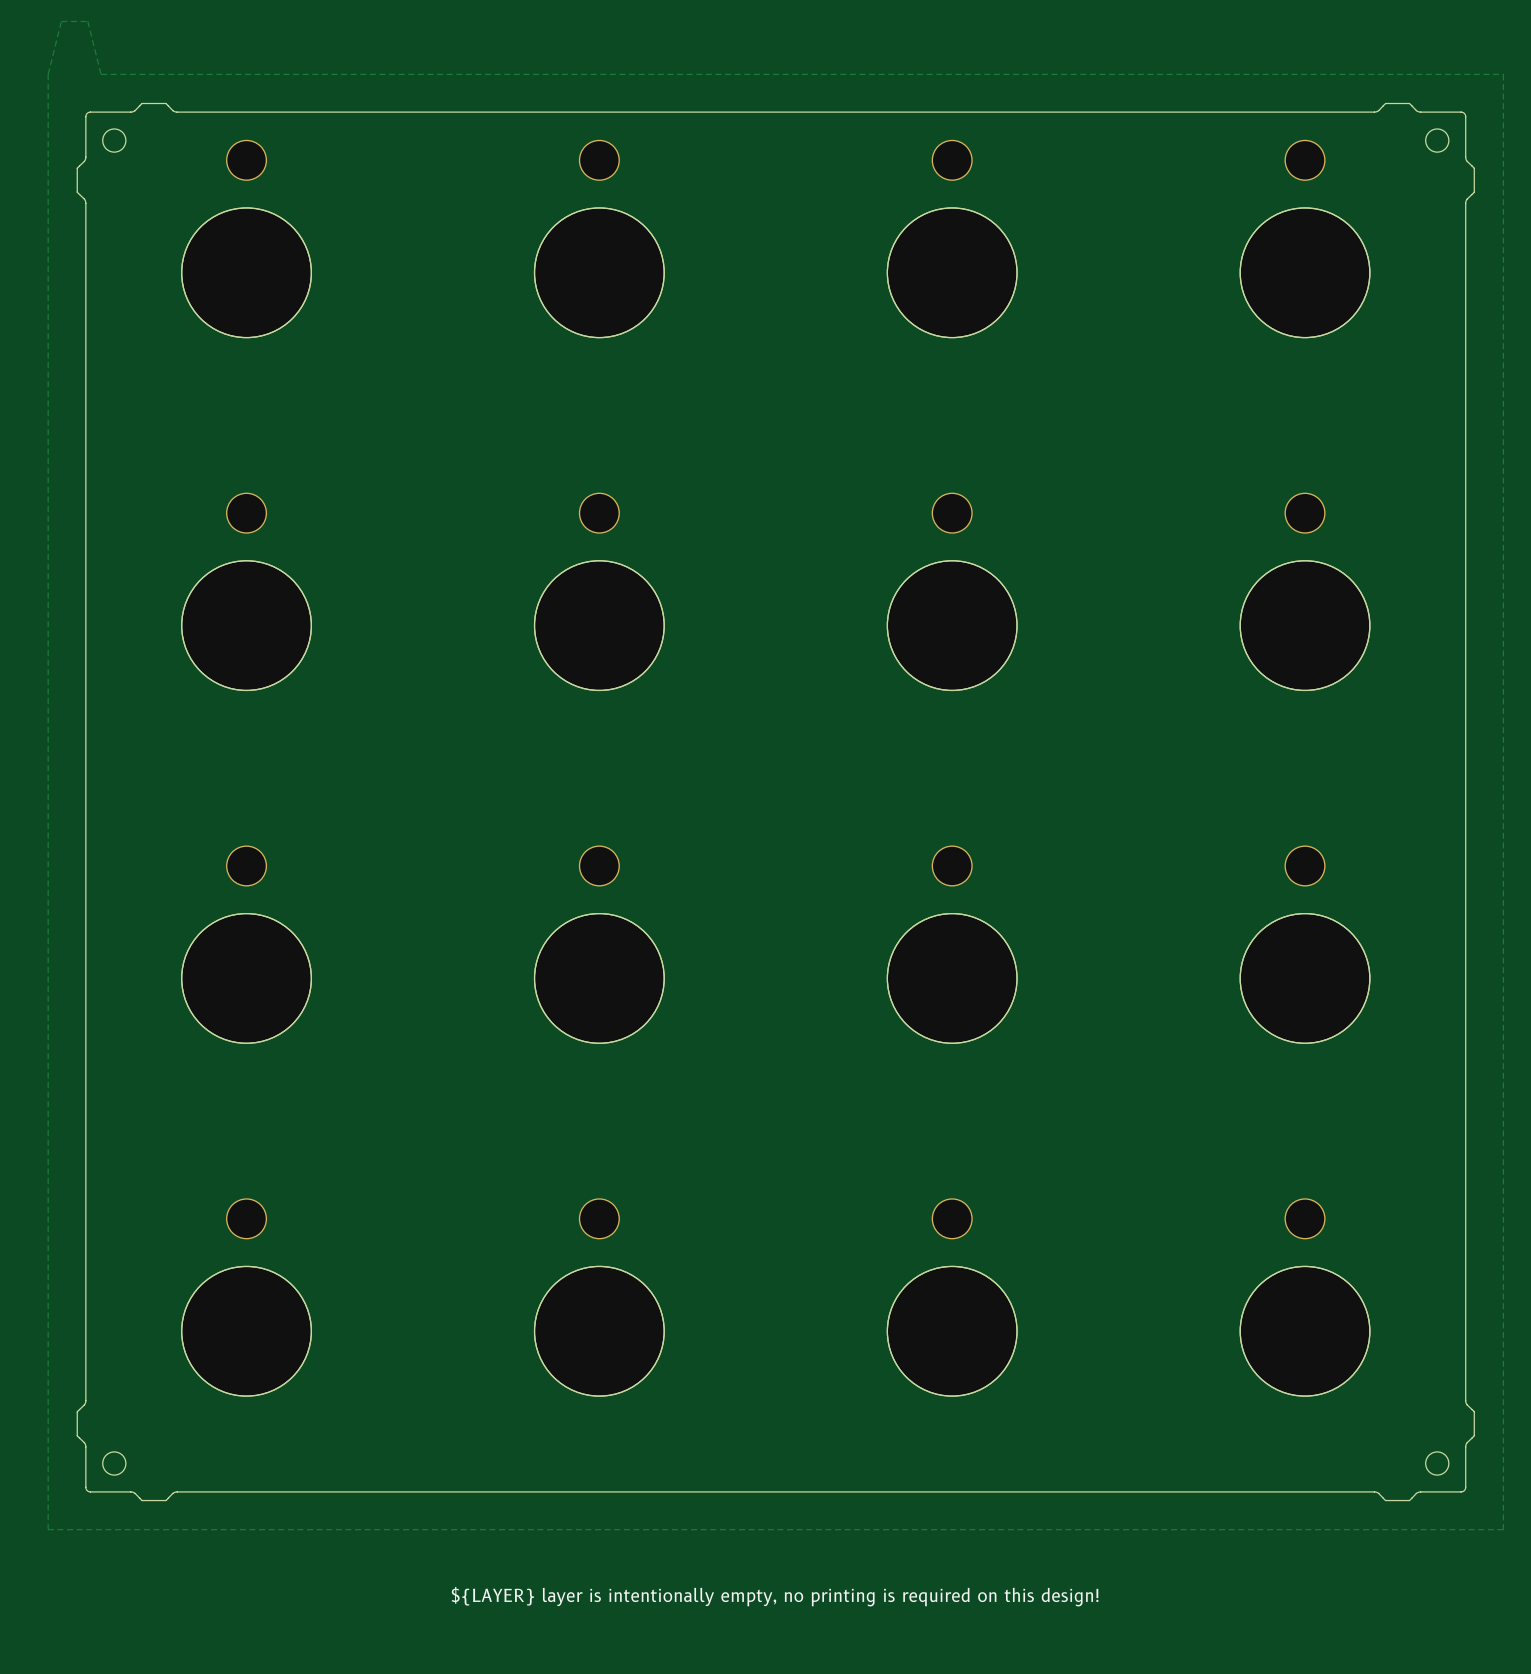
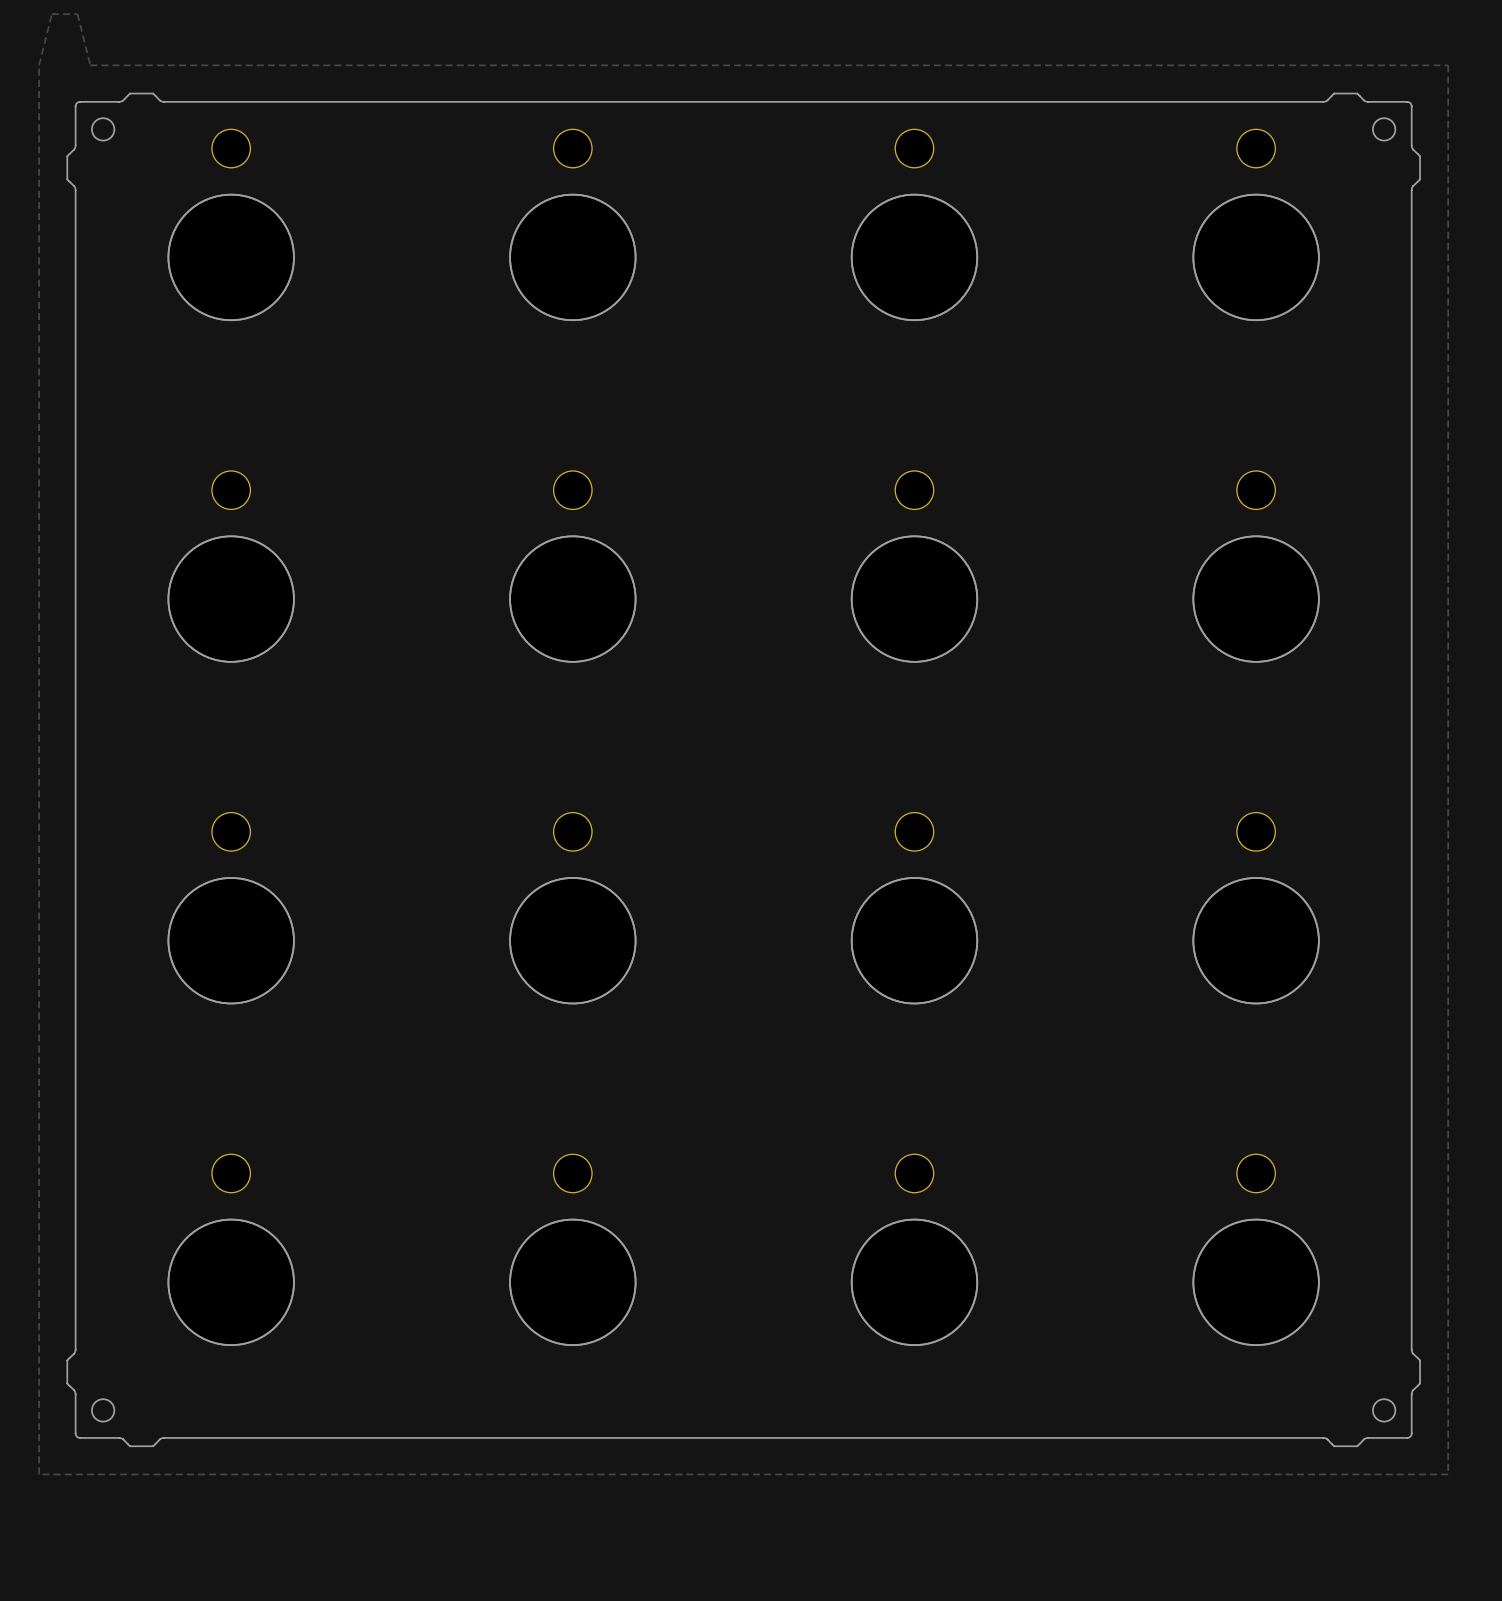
text: ${LAYER} layer is intentionally empty, no printing is required on this design! (775, 1596) -> none

